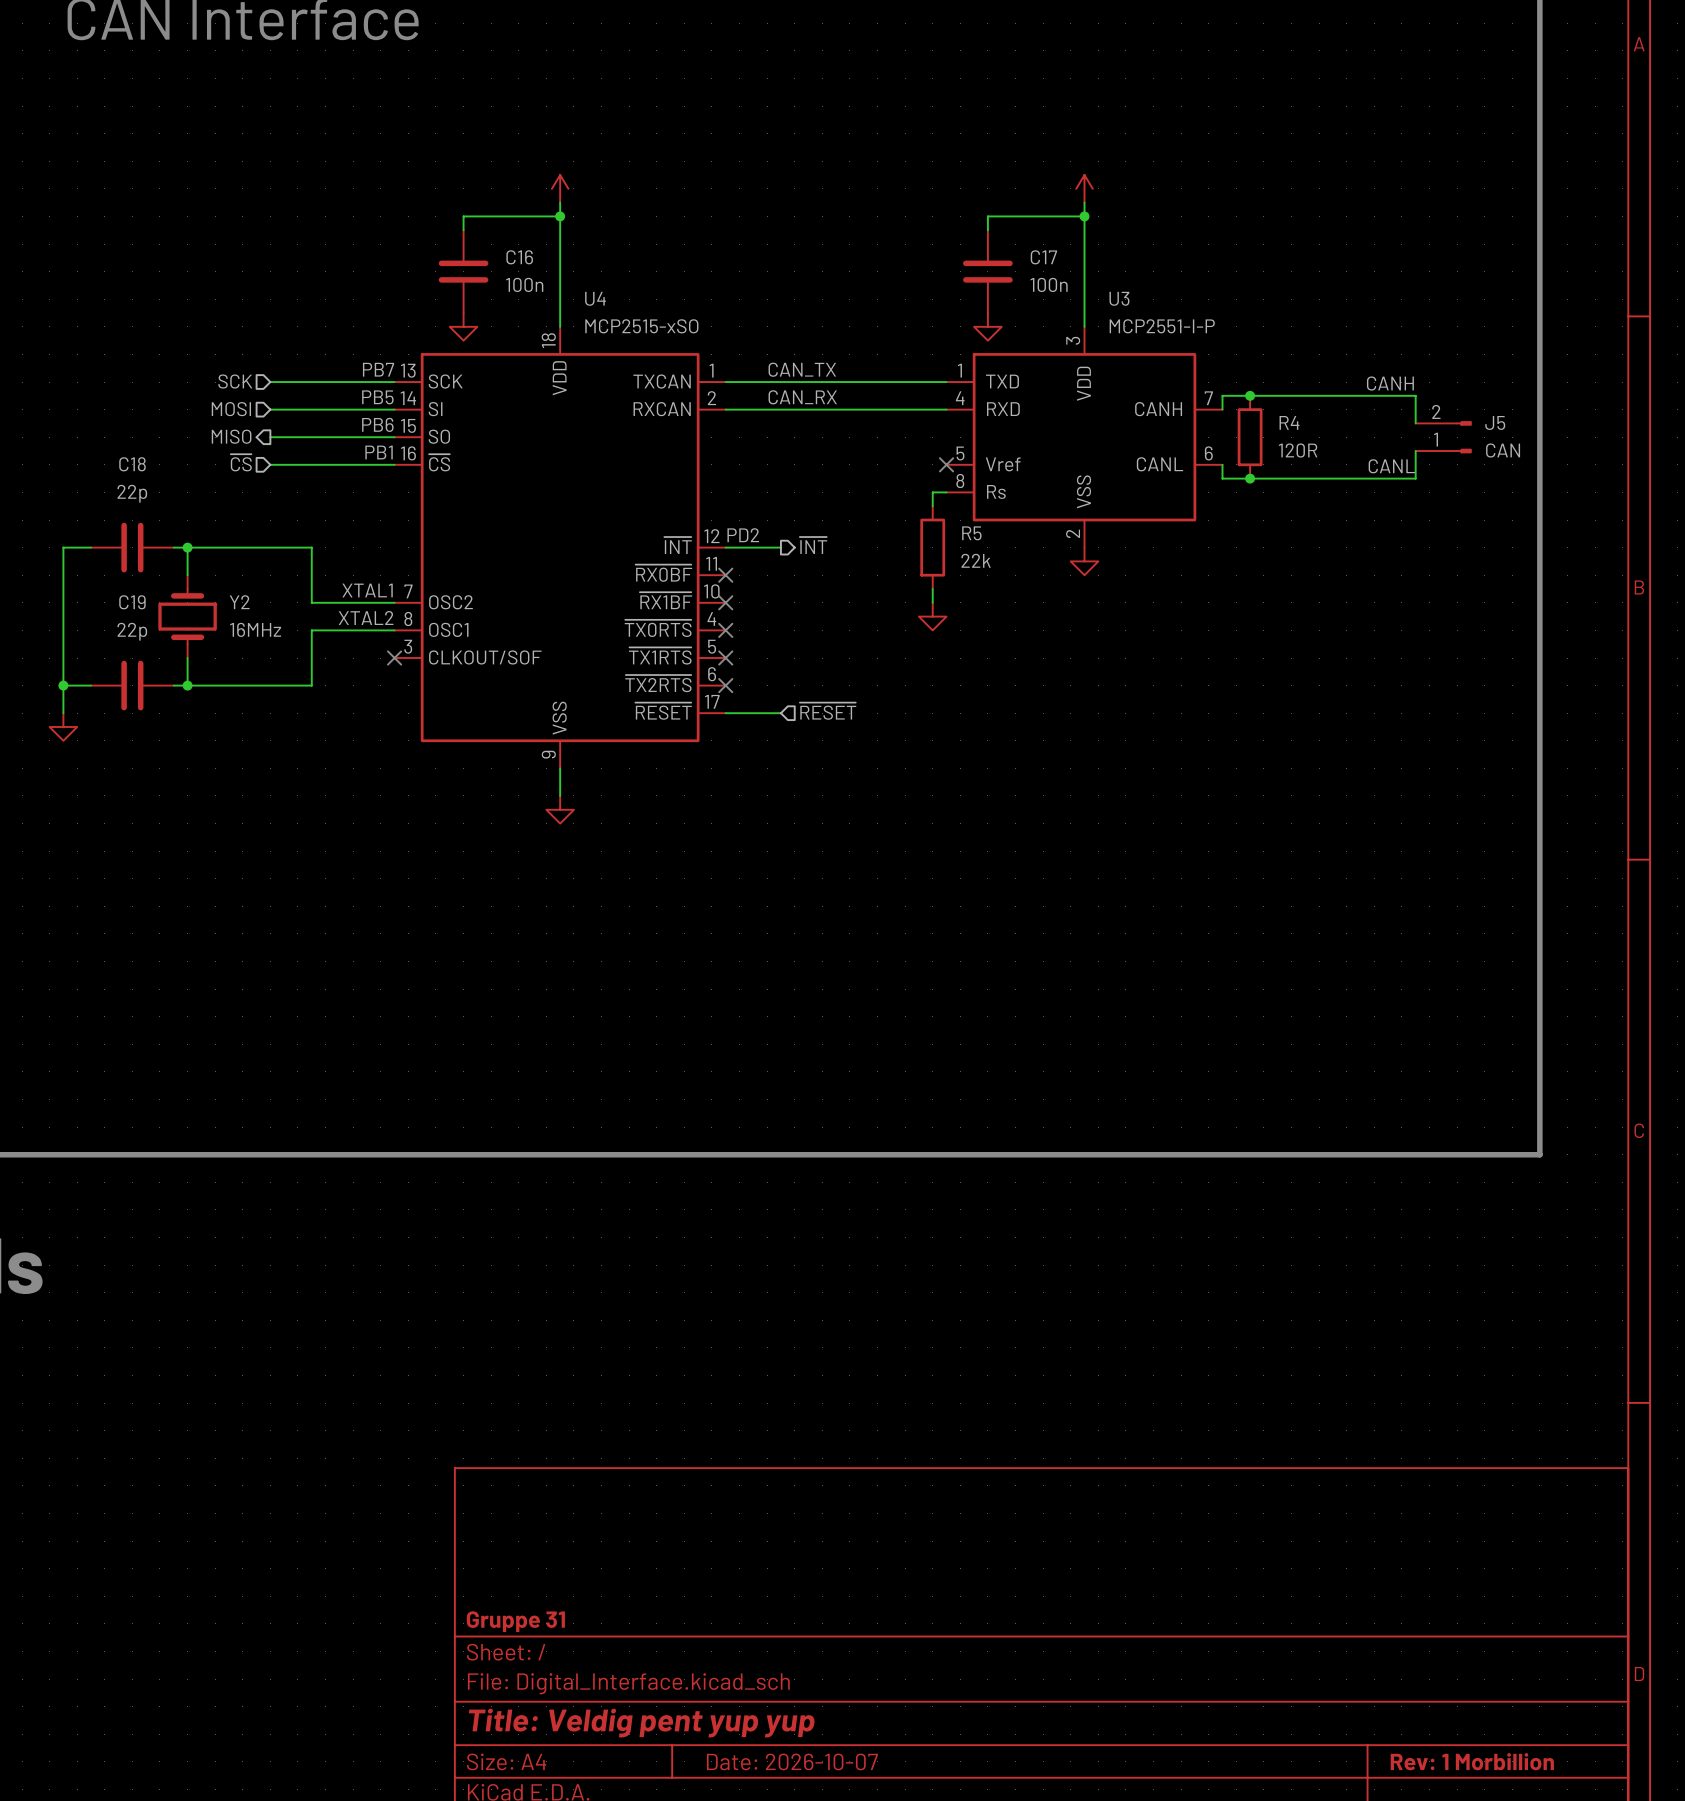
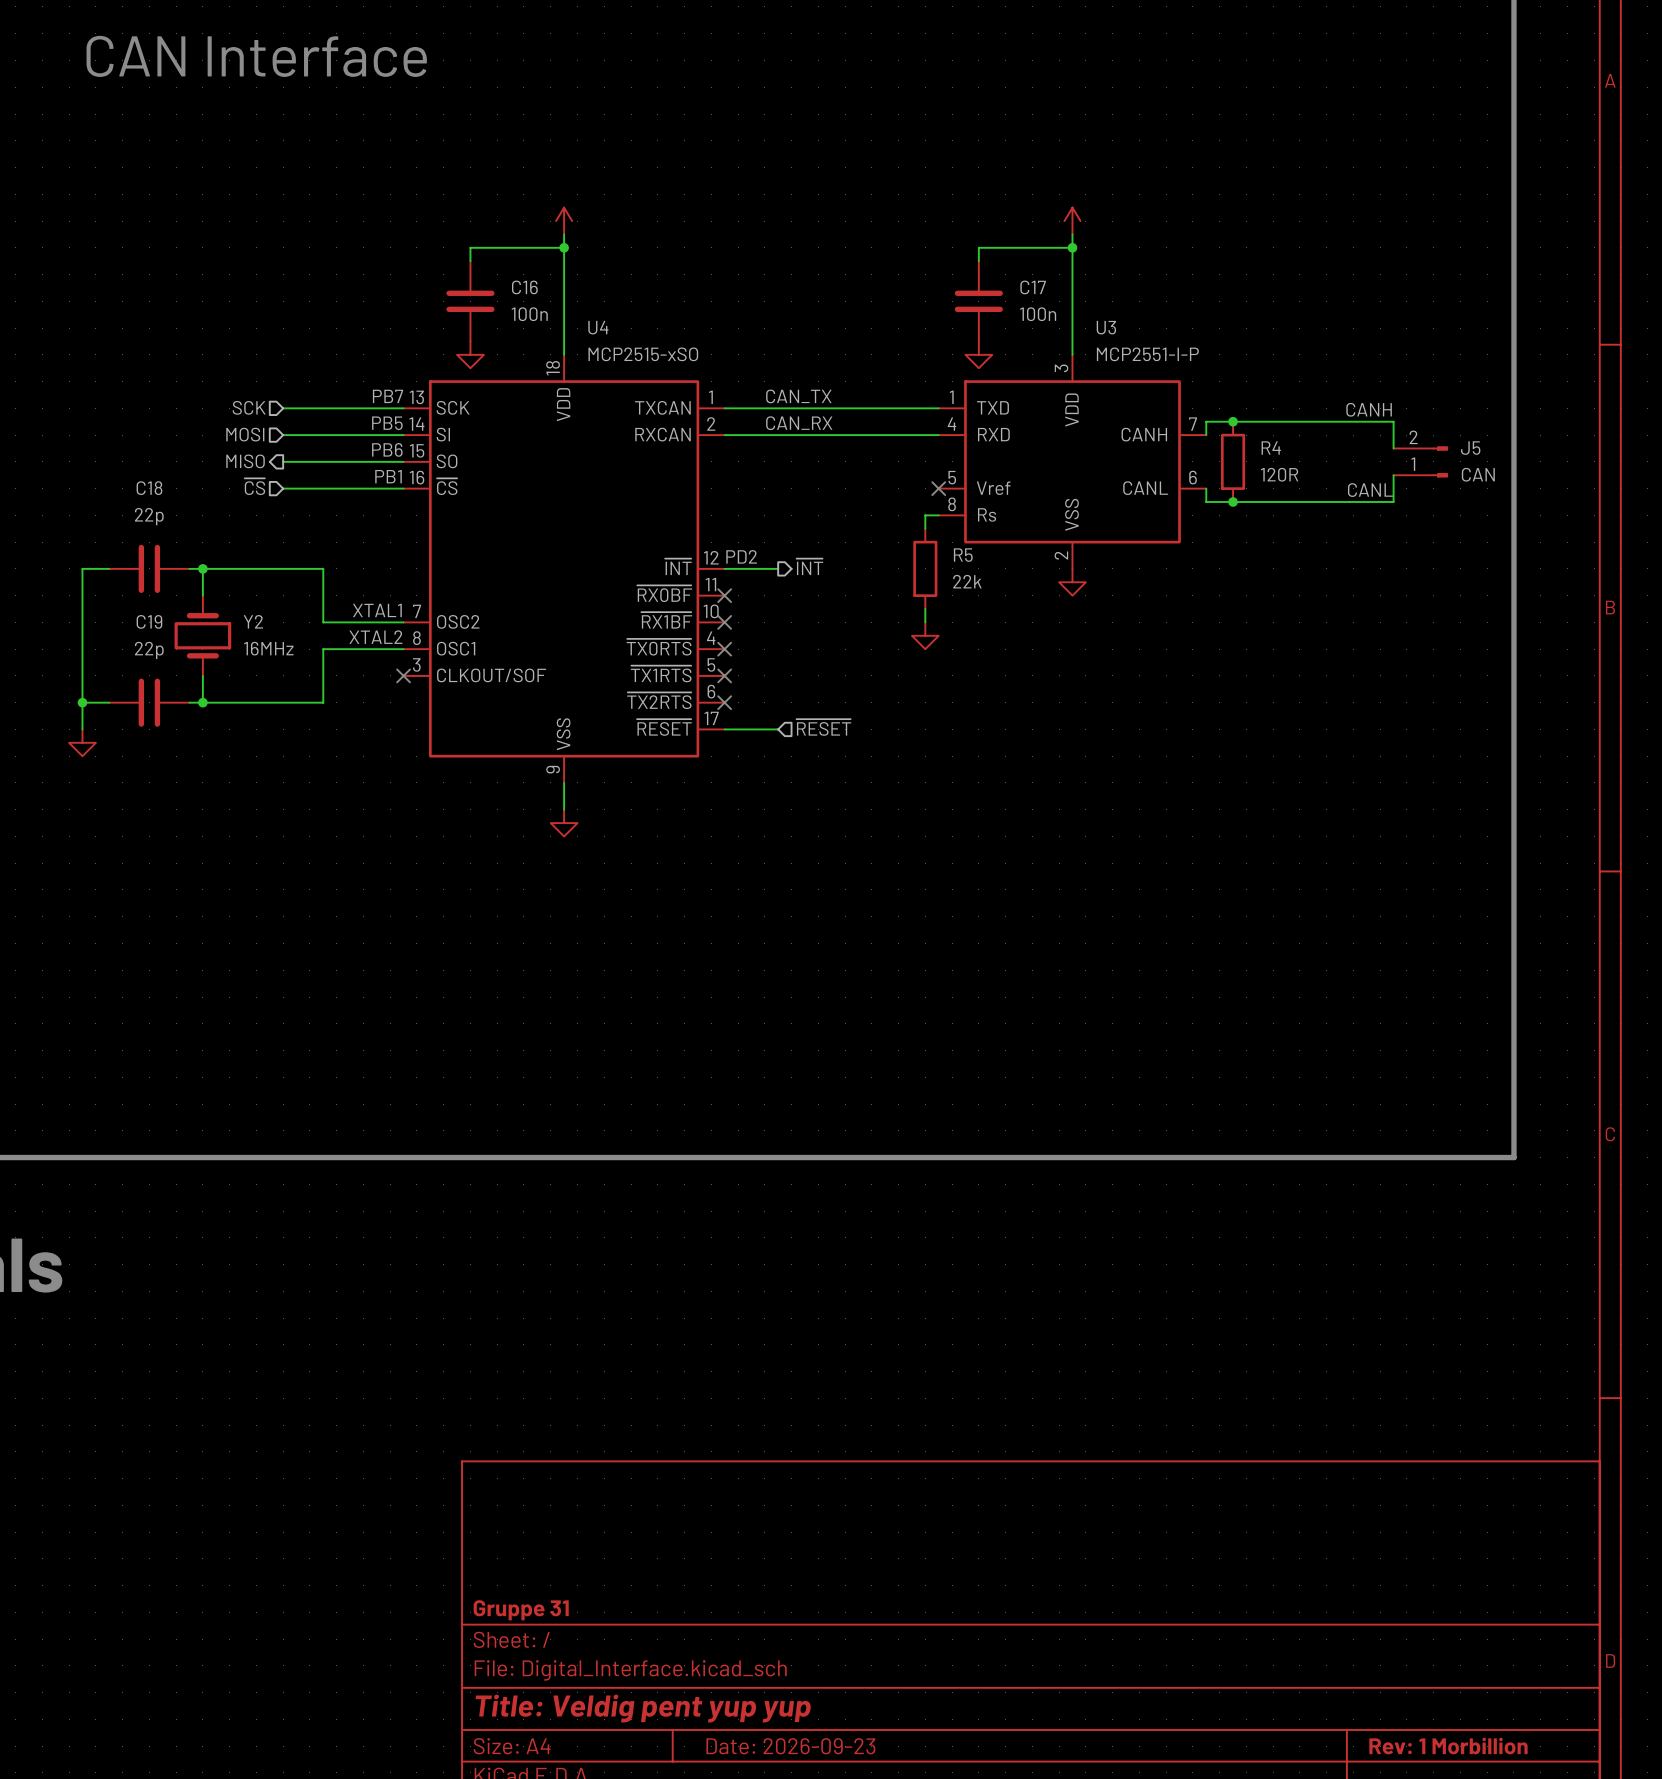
title block: Date: 2026-10-07 (792, 1761) -> Date: 2026-09-23 (790, 1746)

